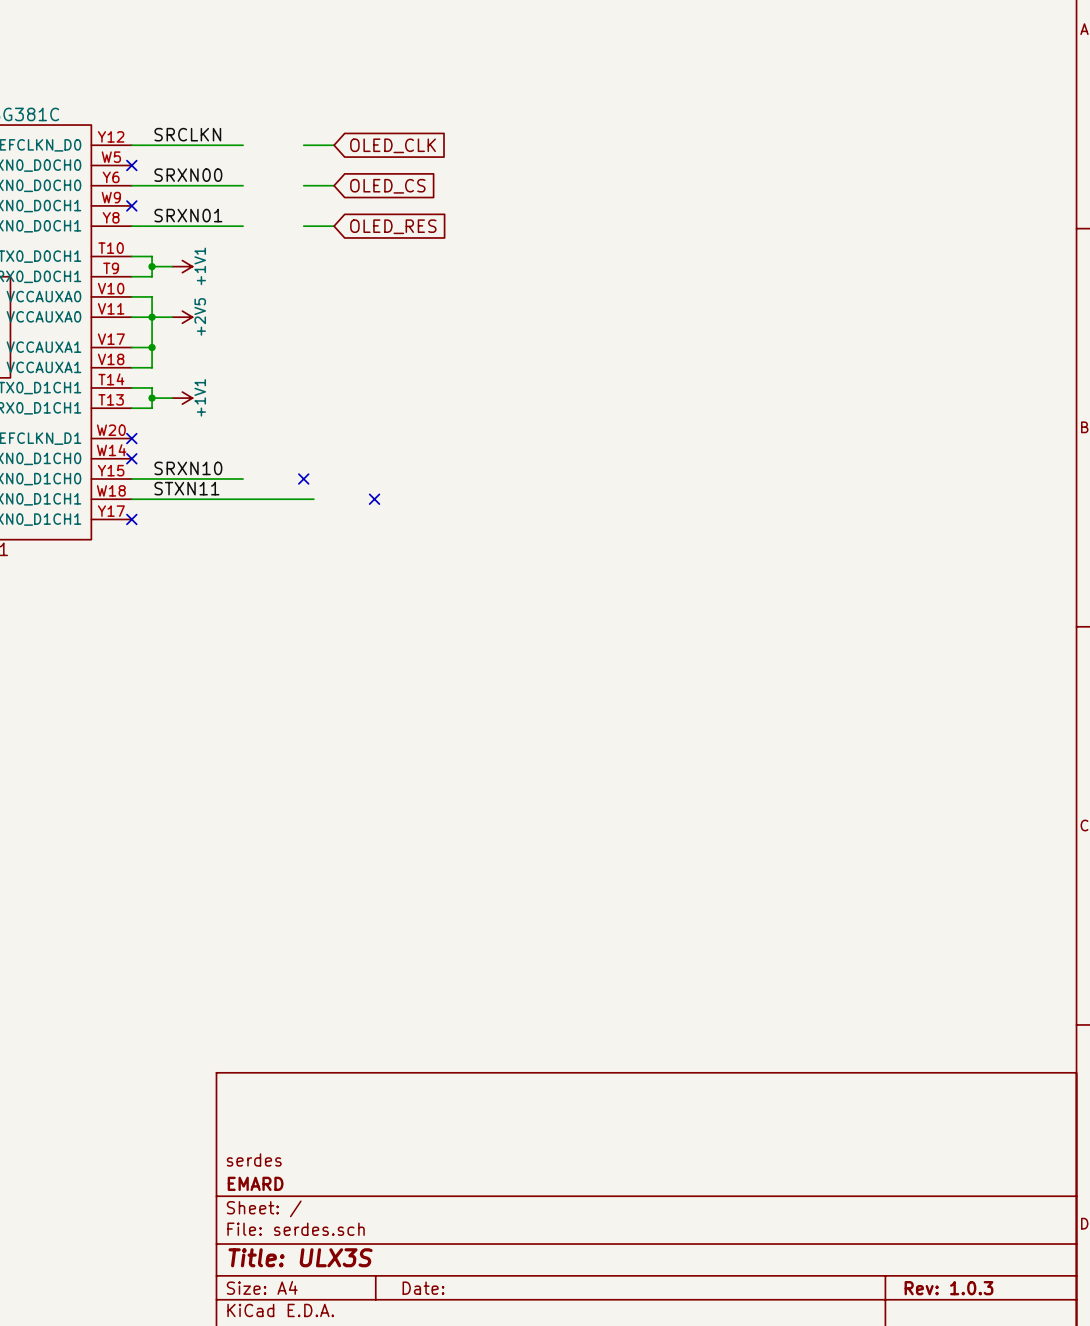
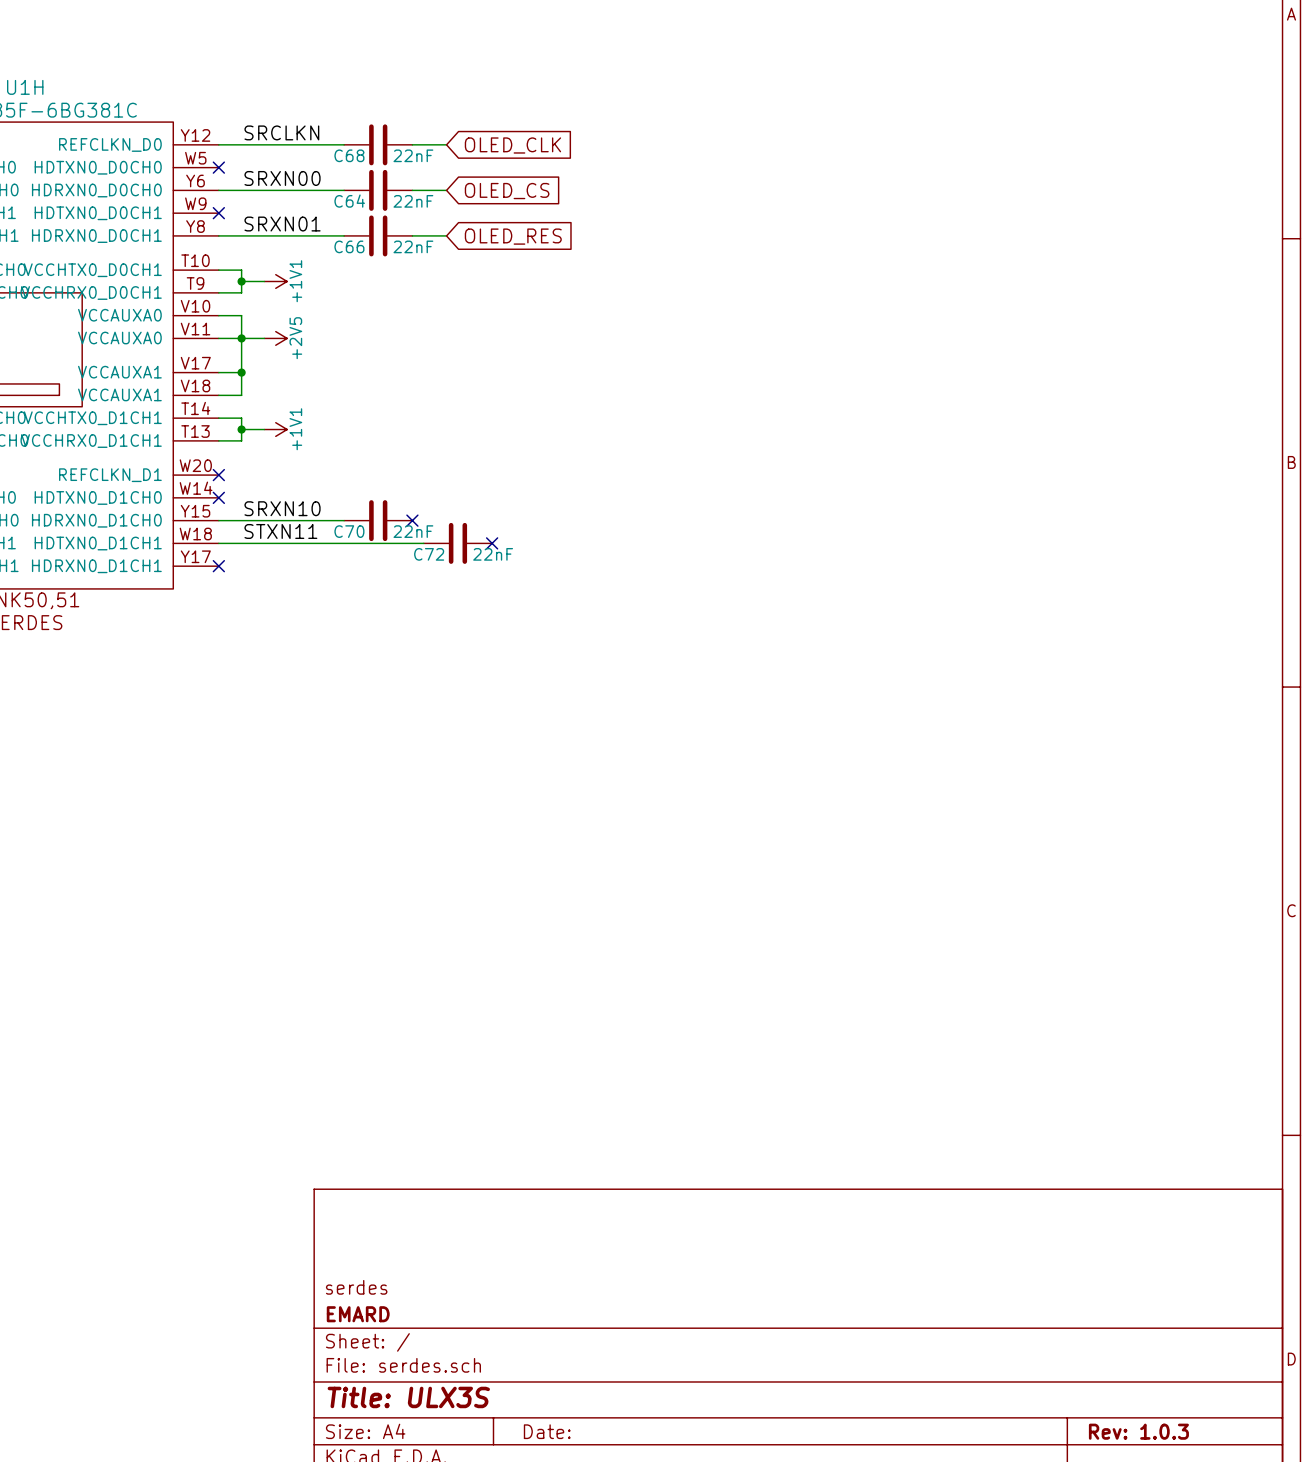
C68: none -> 22nF (378, 144)
C64: none -> 22nF (378, 190)
C66: none -> 22nF (378, 235)
C70: none -> 22nF (378, 520)
C72: none -> 22nF (457, 543)

